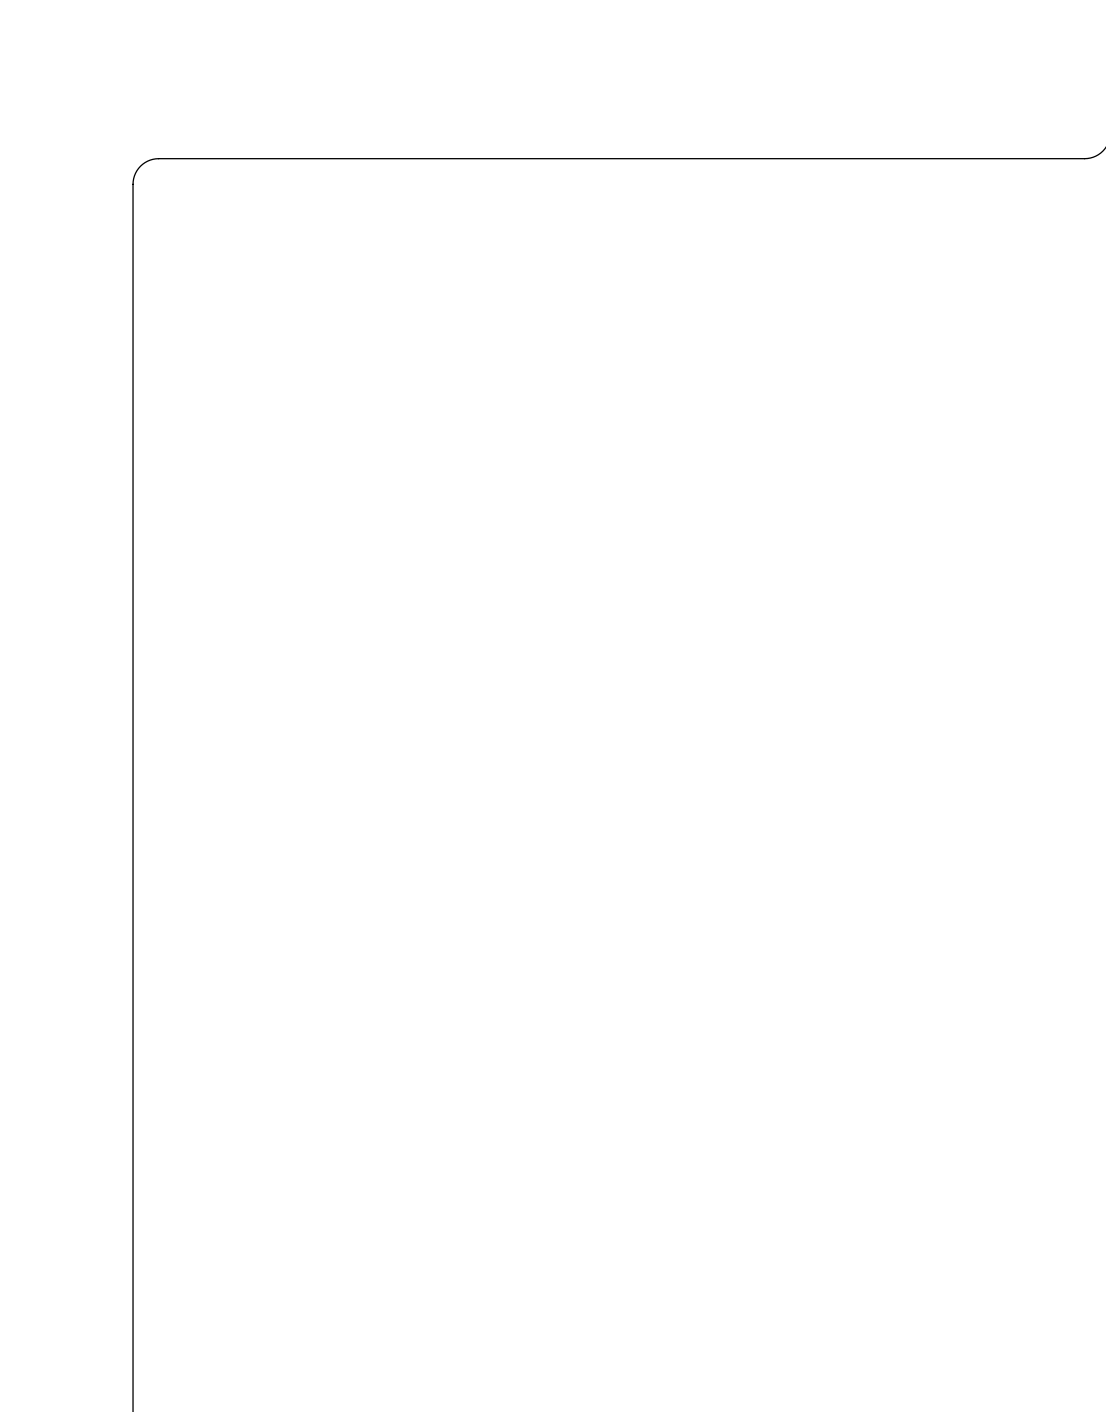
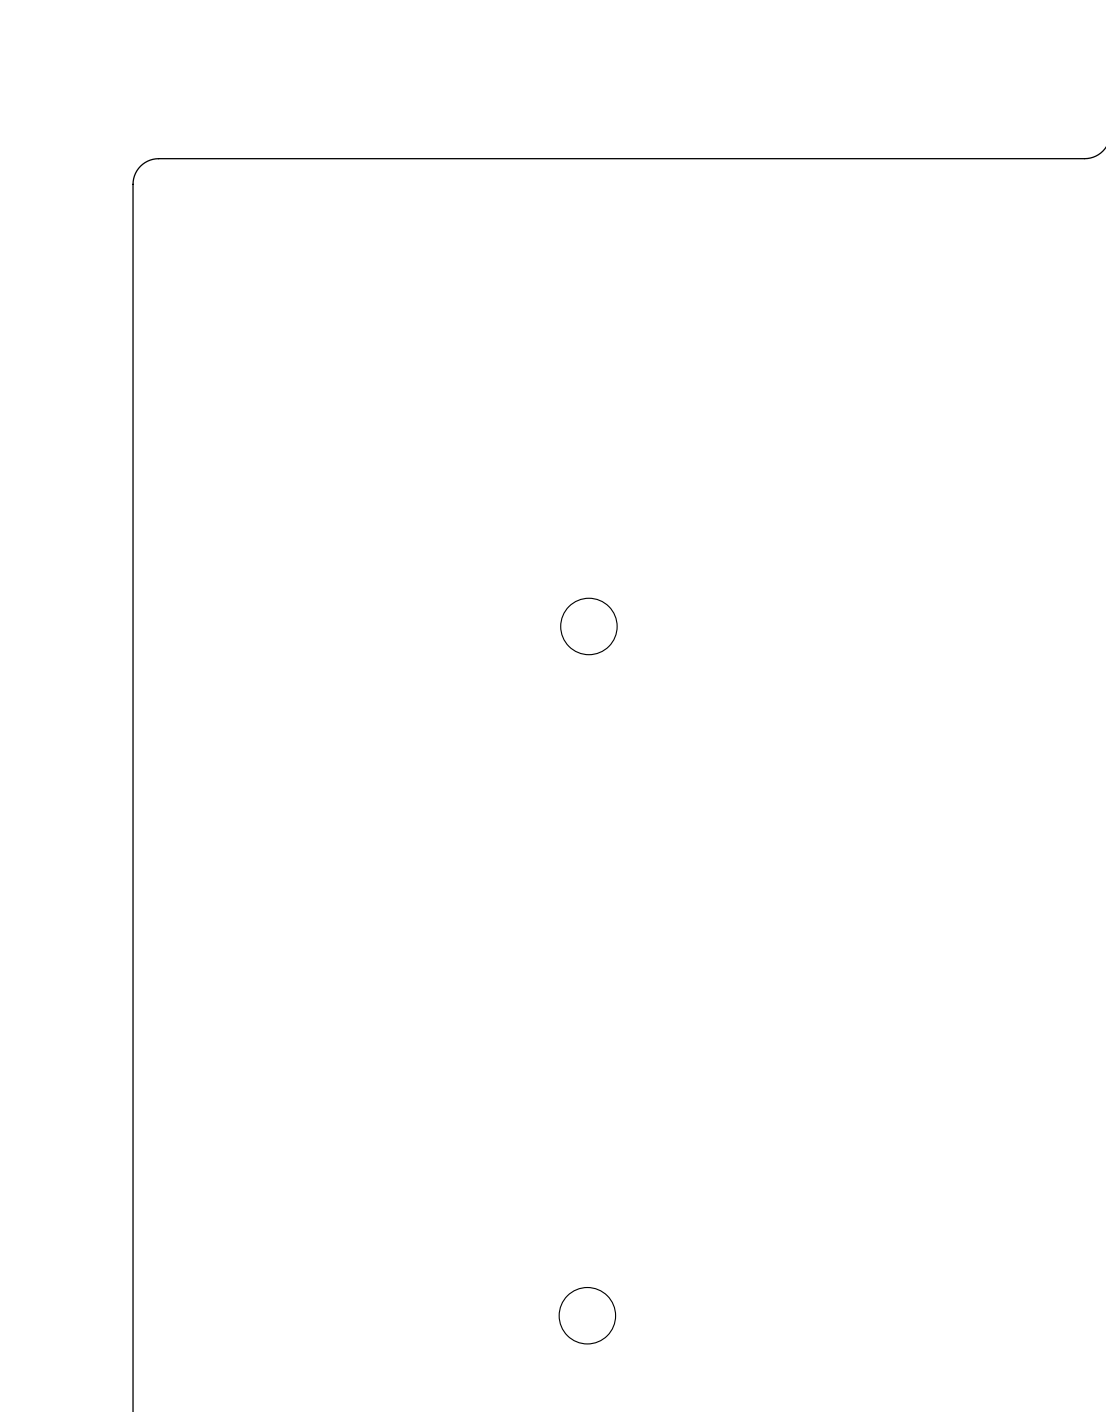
drawing: none -> [560, 598, 618, 655]
drawing: none -> [559, 1287, 616, 1345]

